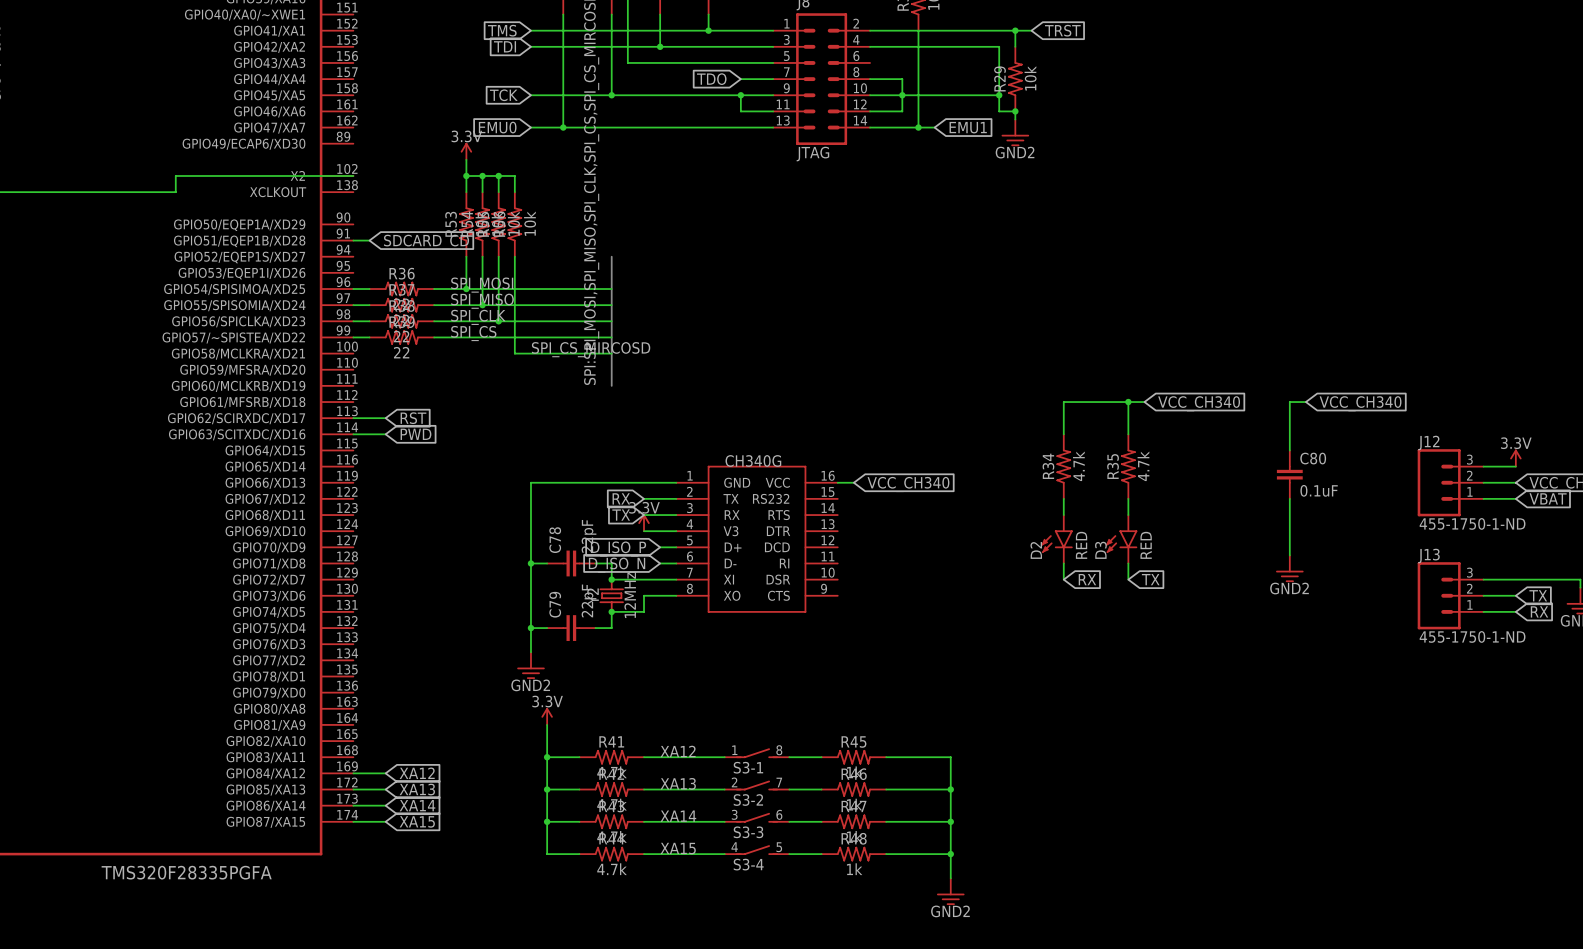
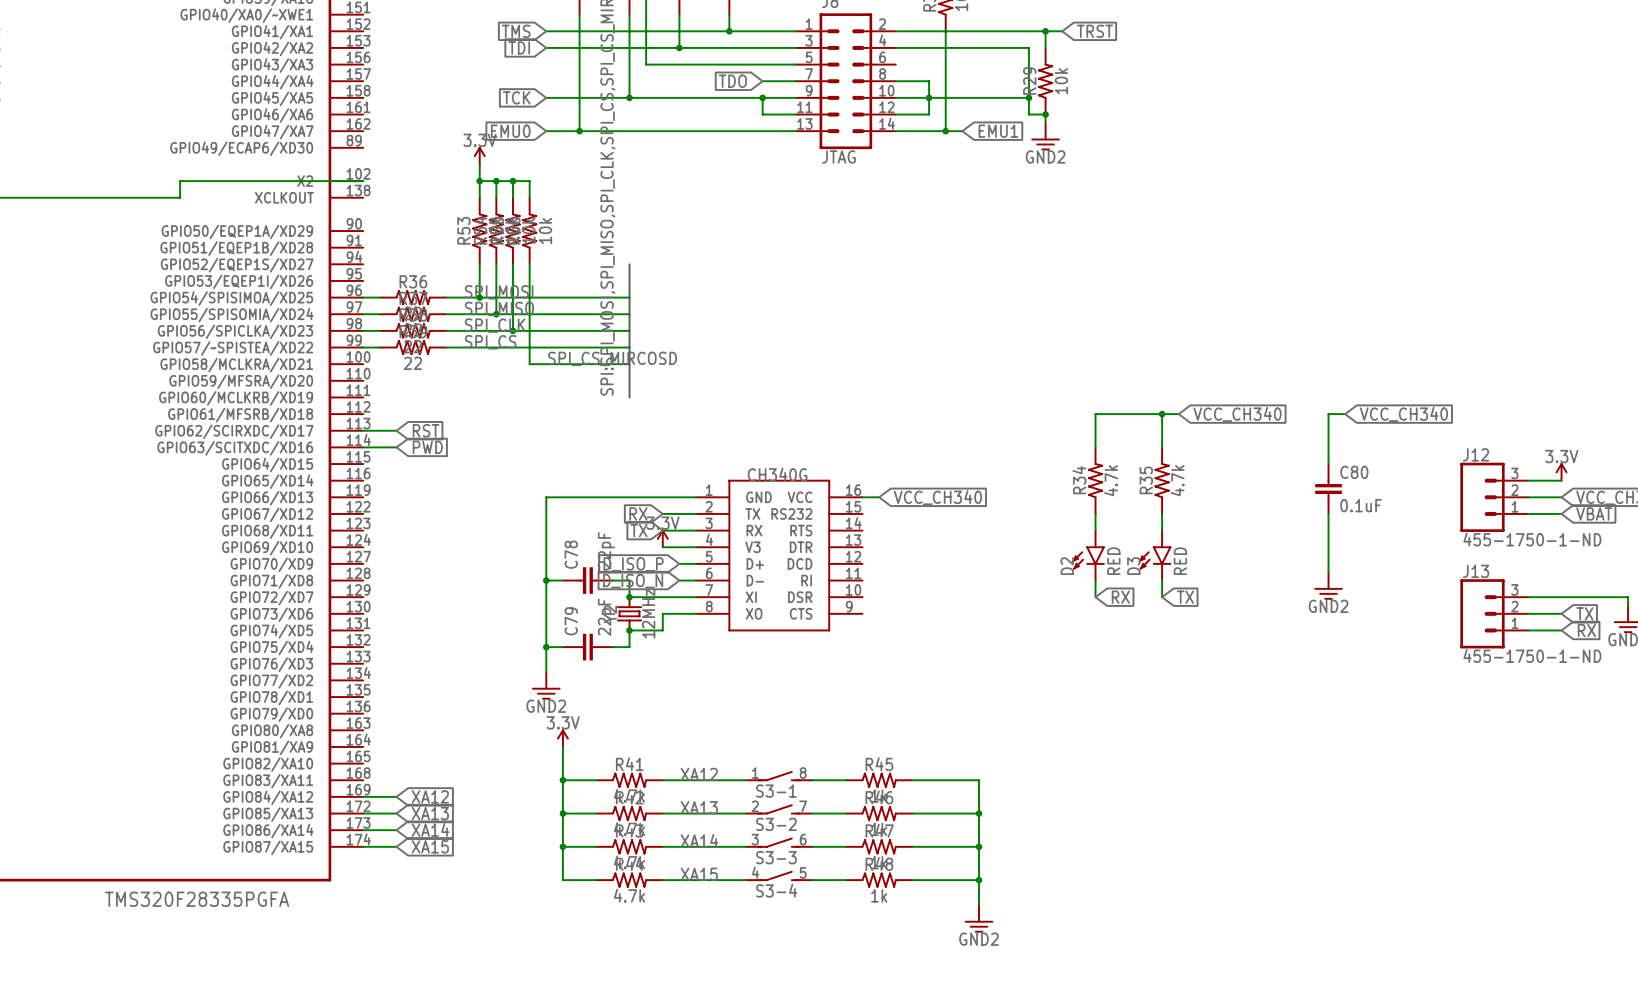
wire: (353, 240) (369, 240) -> none
global label: SDCARD_CD (426, 242) -> none

